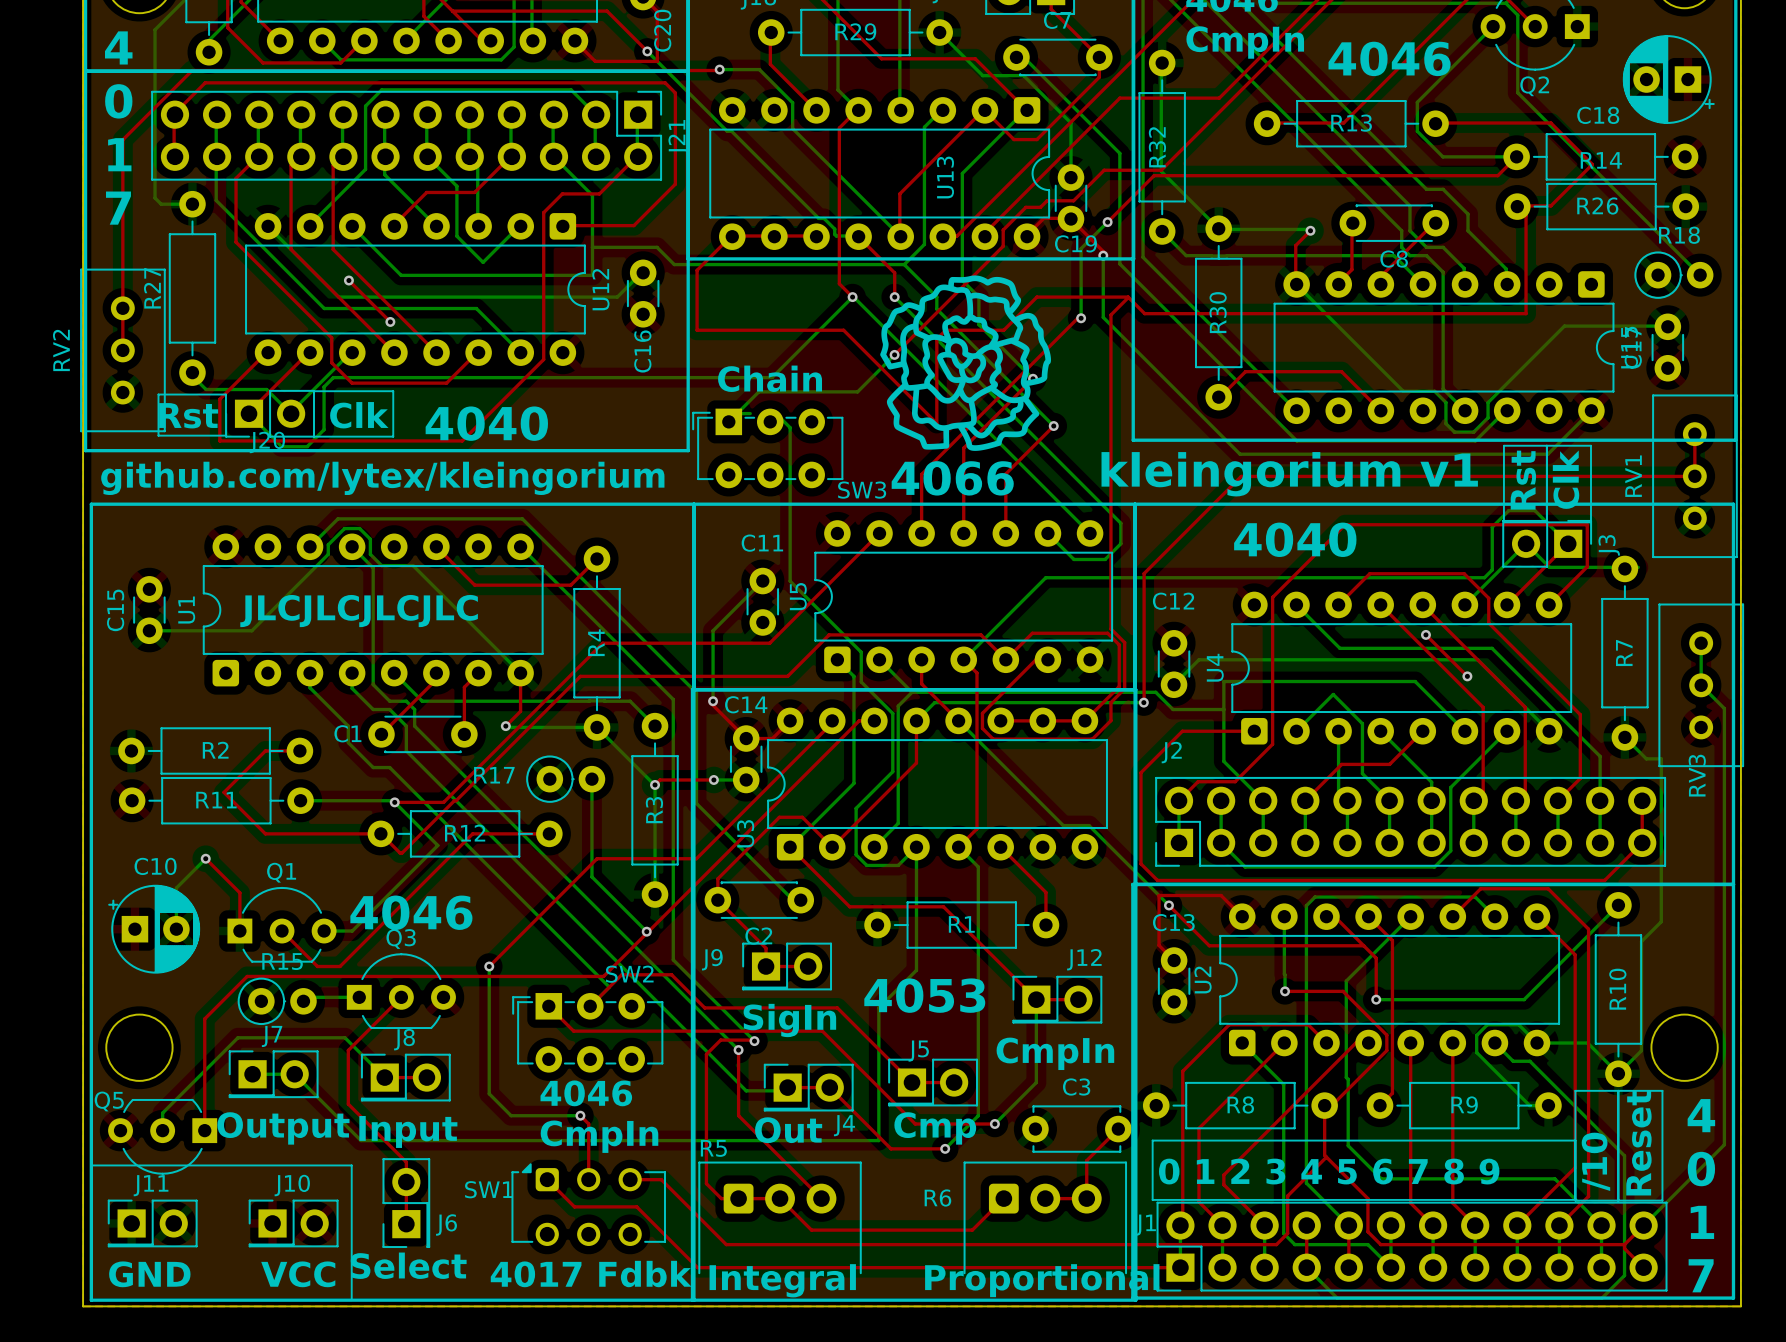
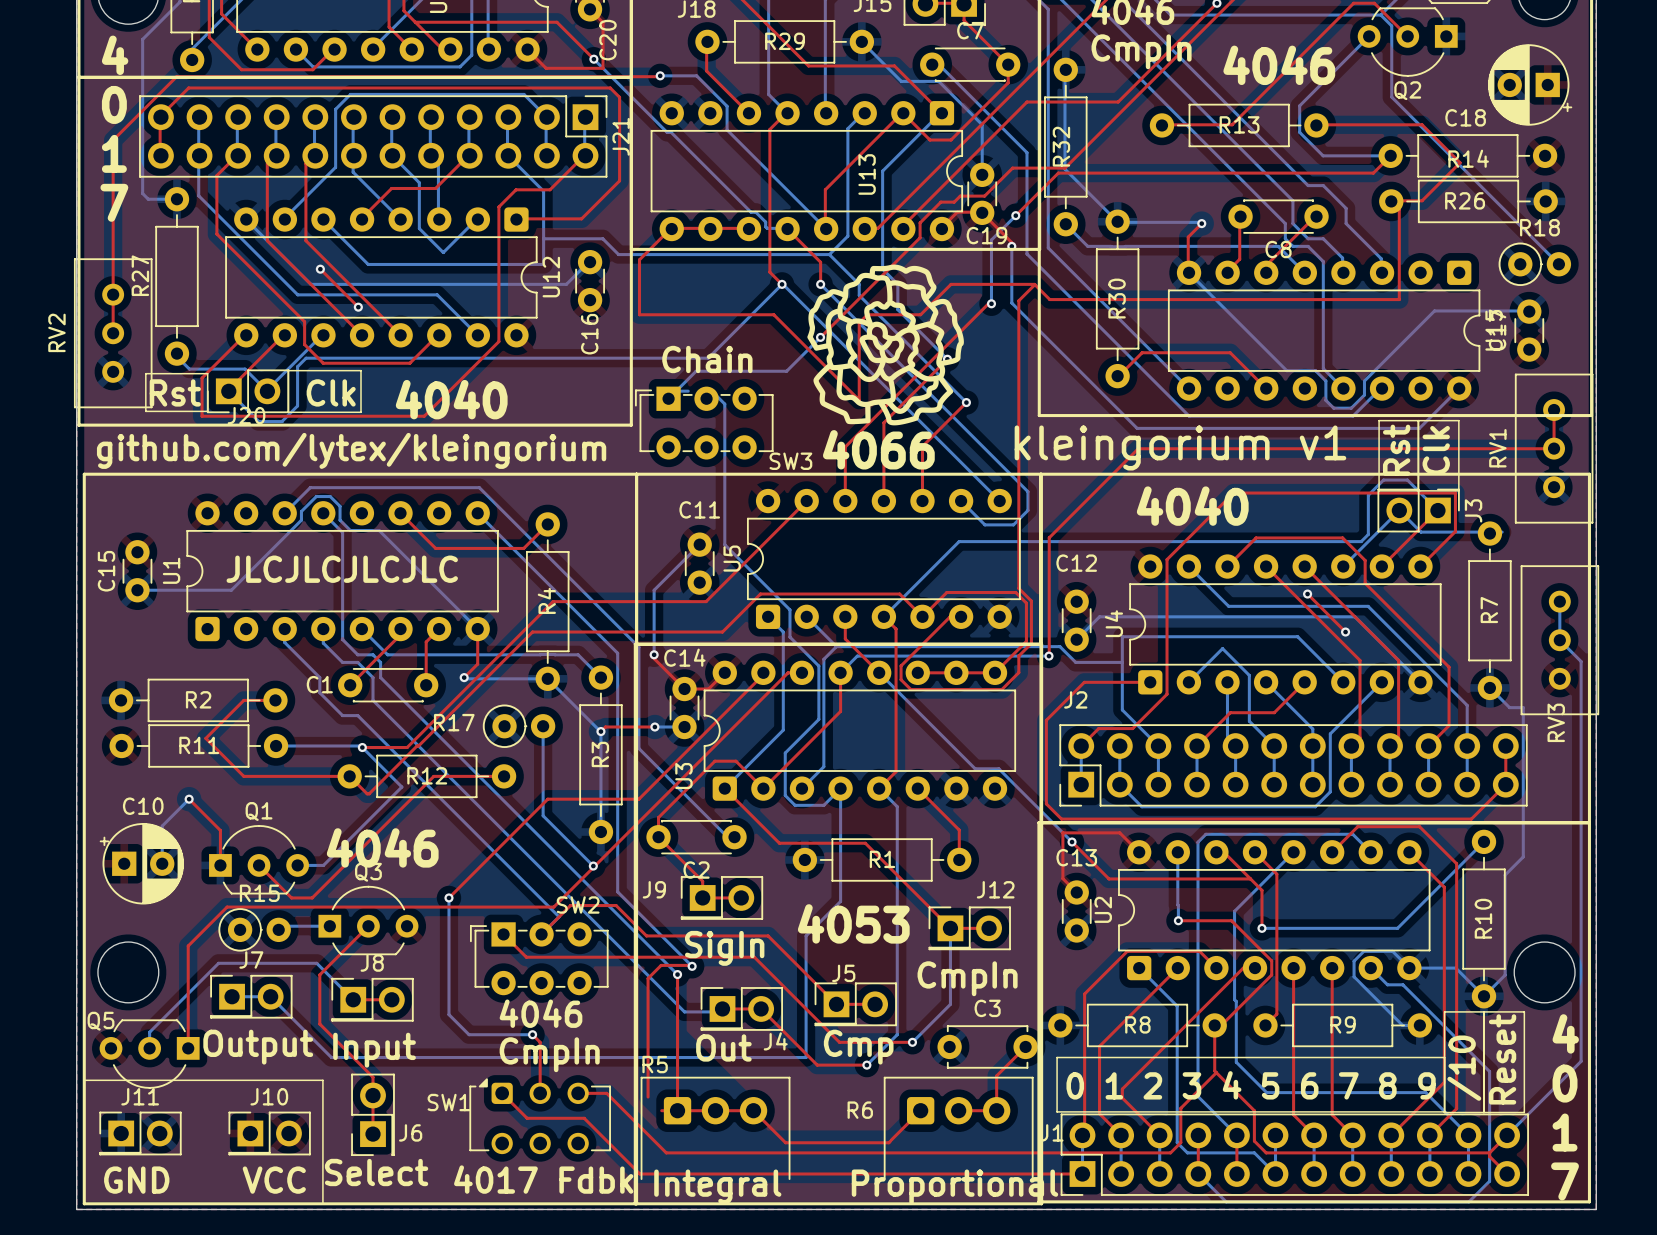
top track: (738, 1115) (821, 1198) -> (677, 1034) (677, 1110)
top track: (706, 1183) (721, 1198) -> none
top track: (780, 1198) (811, 1230) (972, 1230) -> (715, 1110) (753, 1110) (785, 1142) (888, 1142) (890, 1140)

